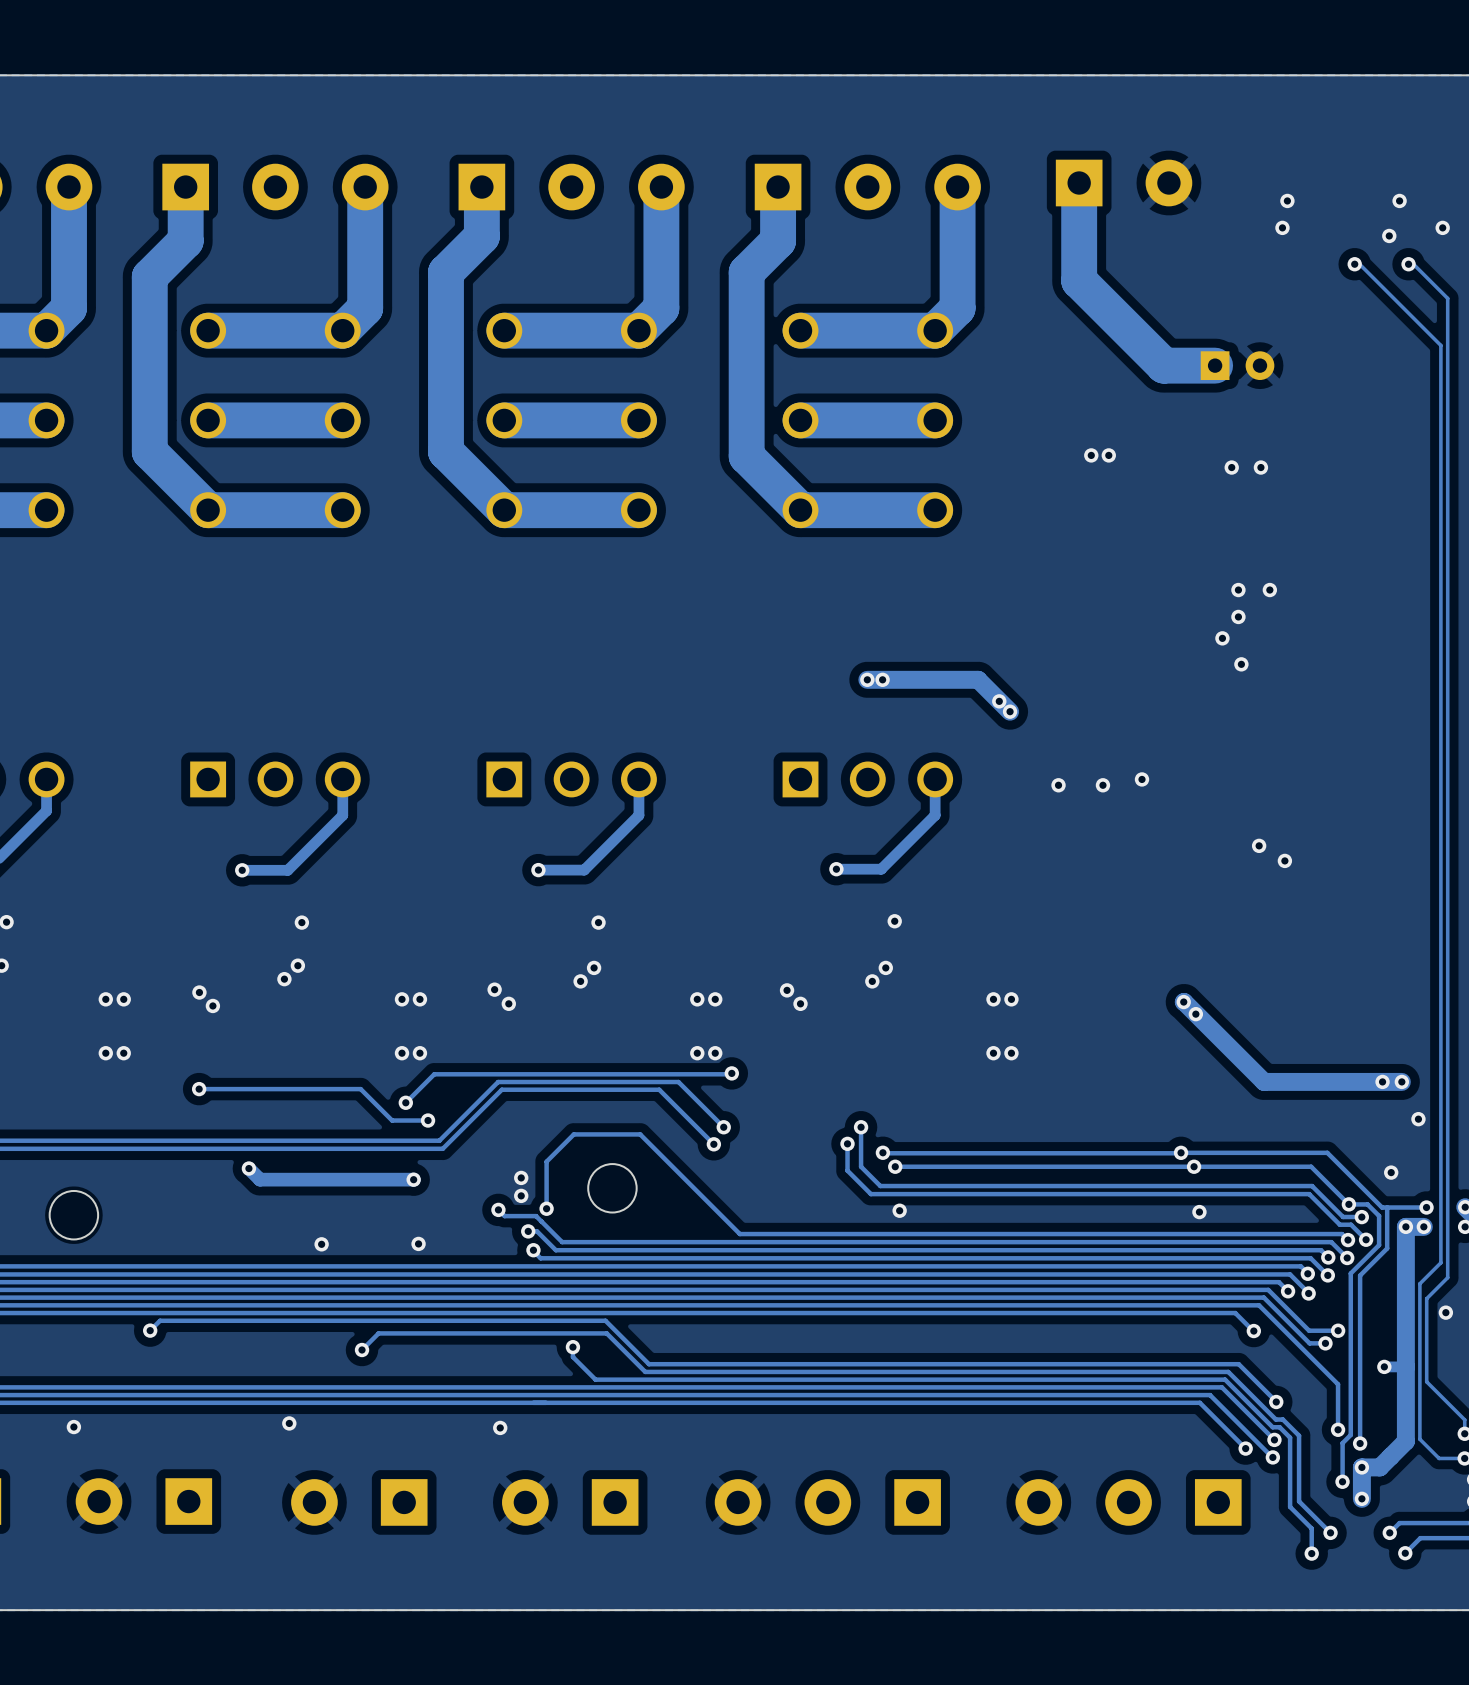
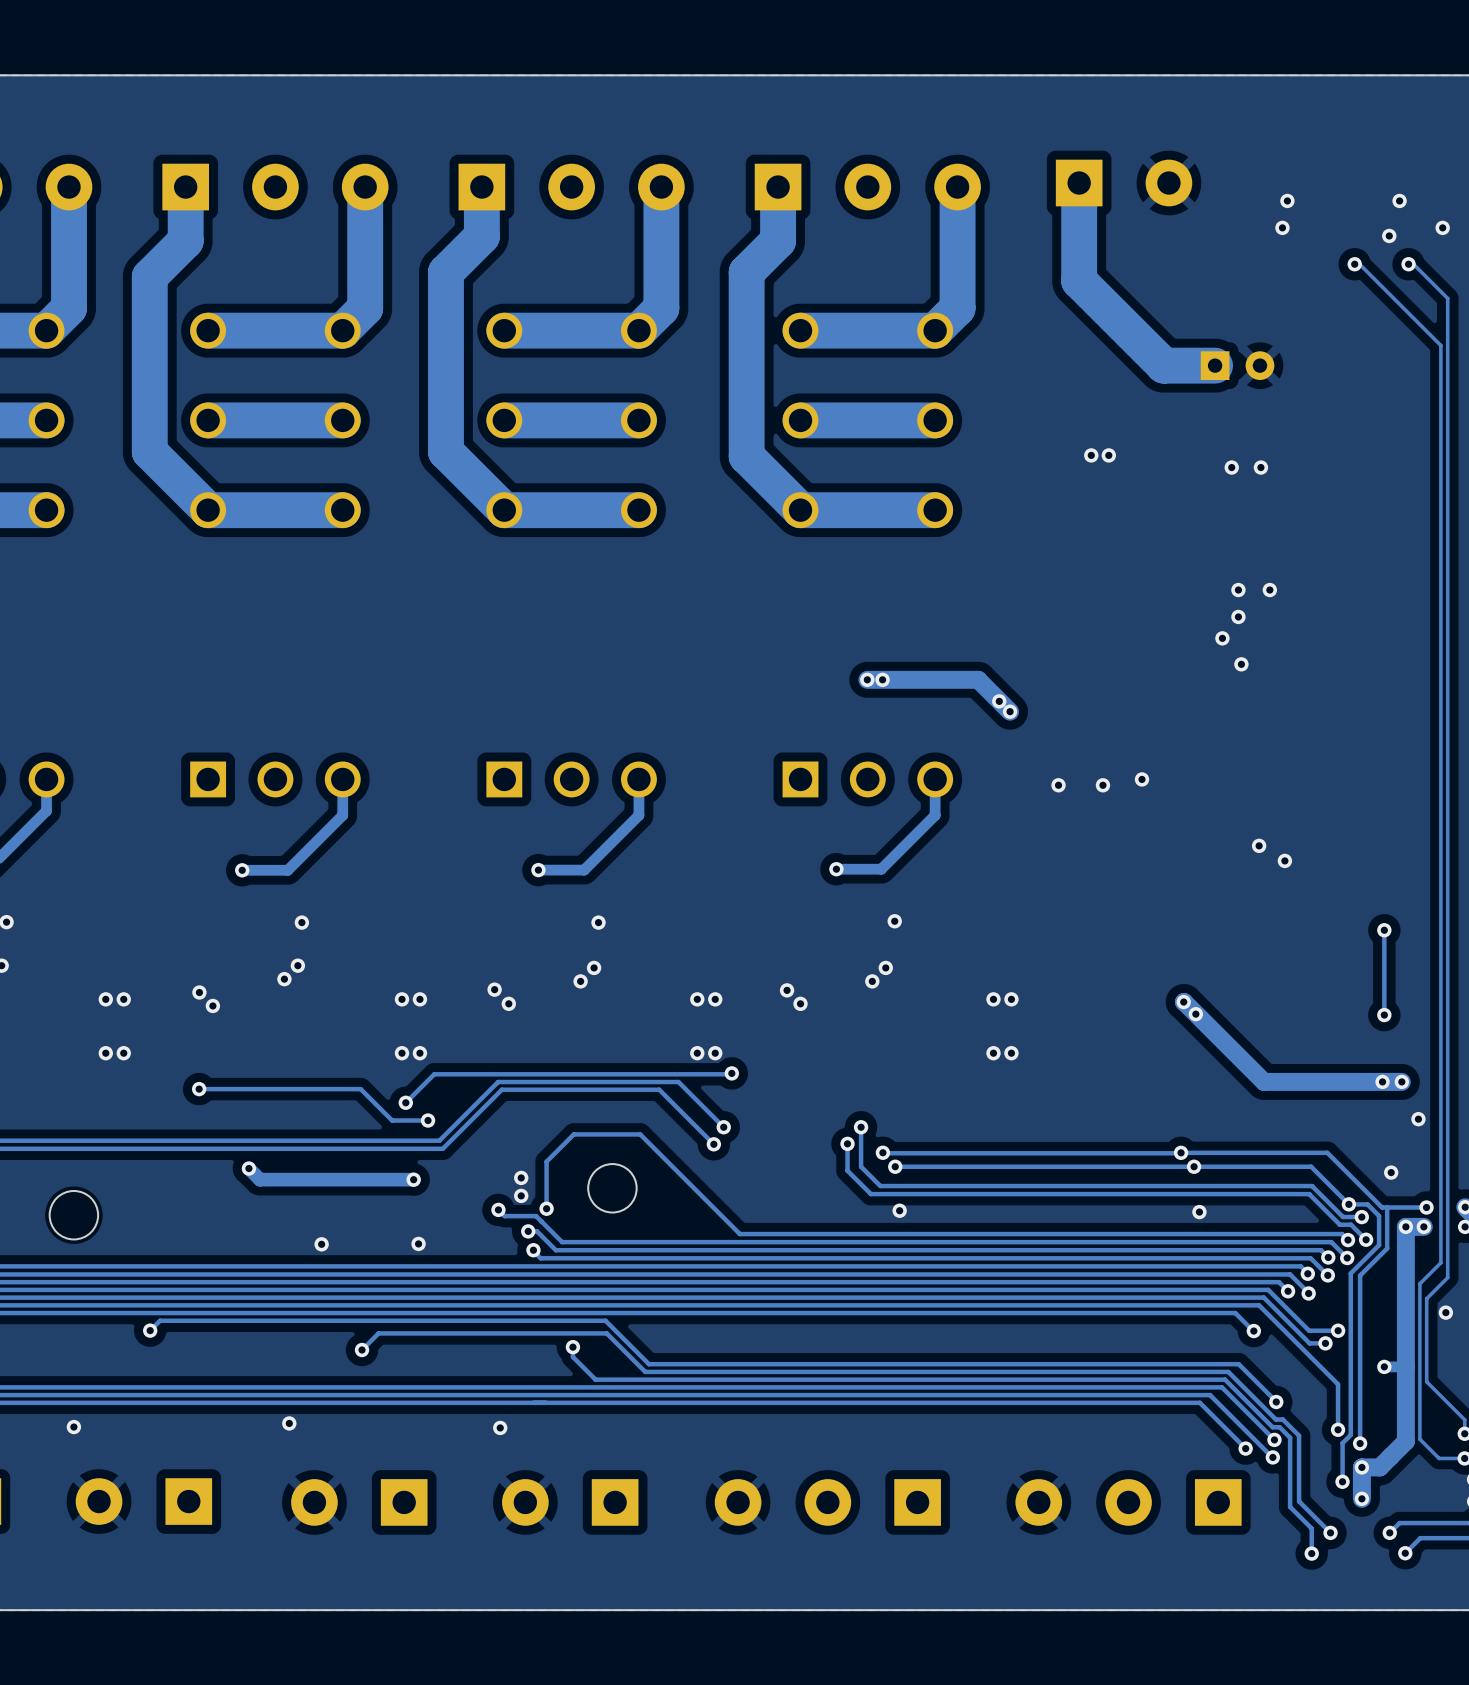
track: none -> (1384, 930) (1384, 1015)
via: none -> (1384, 930)
via: none -> (1384, 1015)

